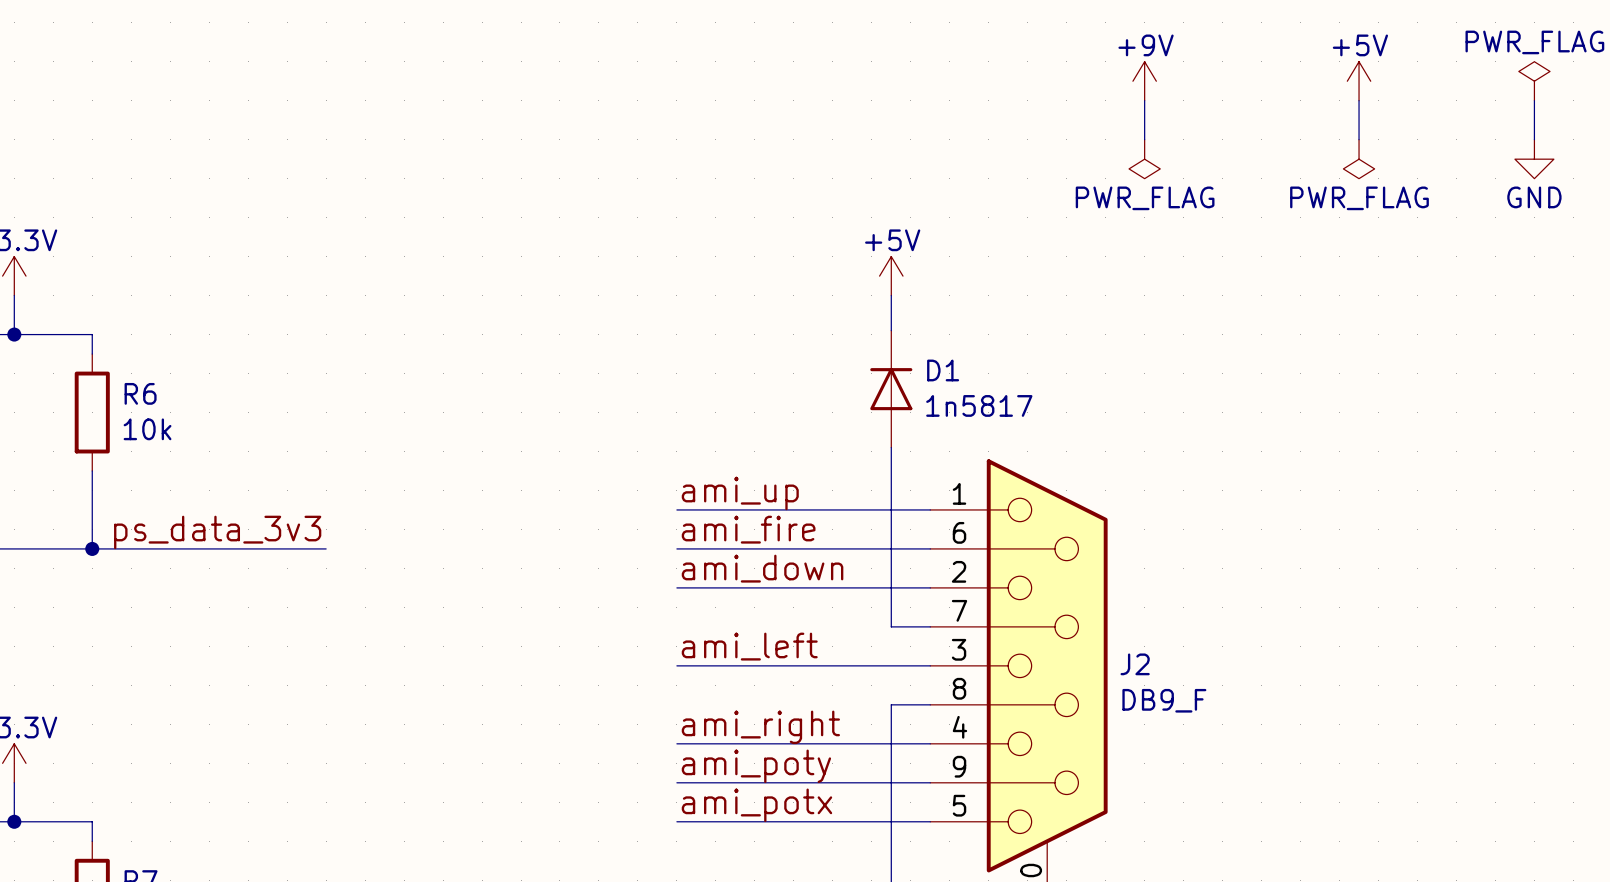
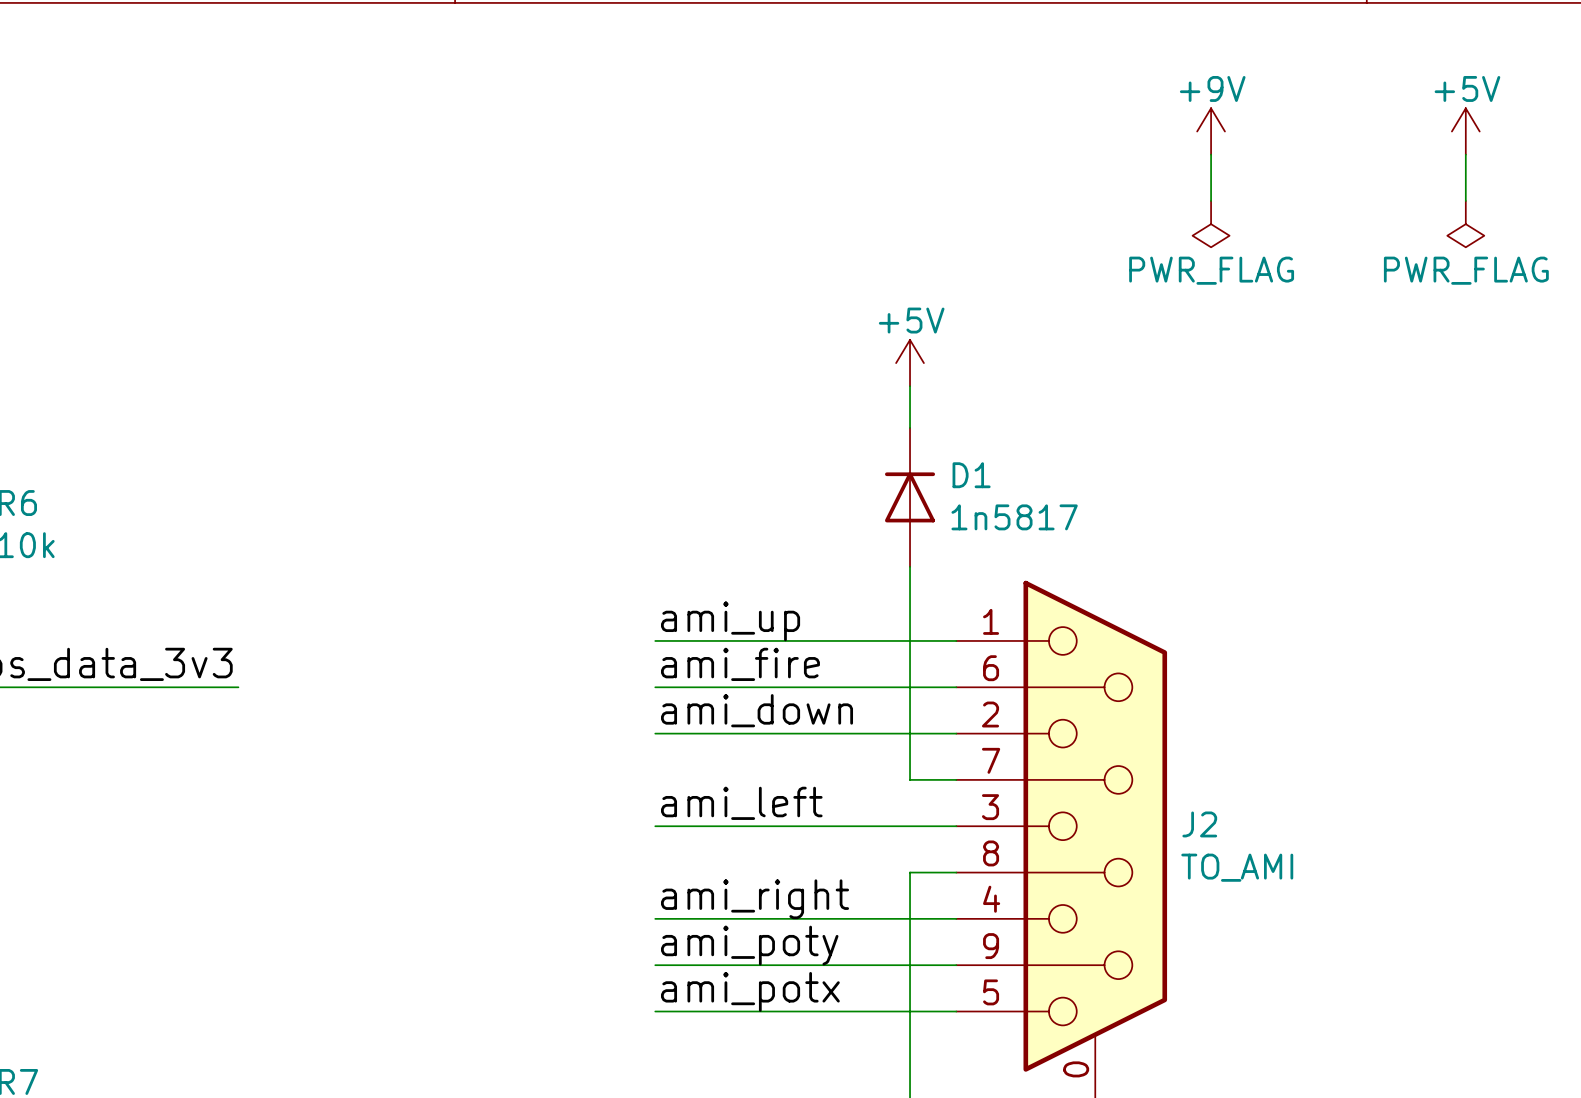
J2 value: DB9_F (1164, 700) -> TO_AMI (1237, 867)

